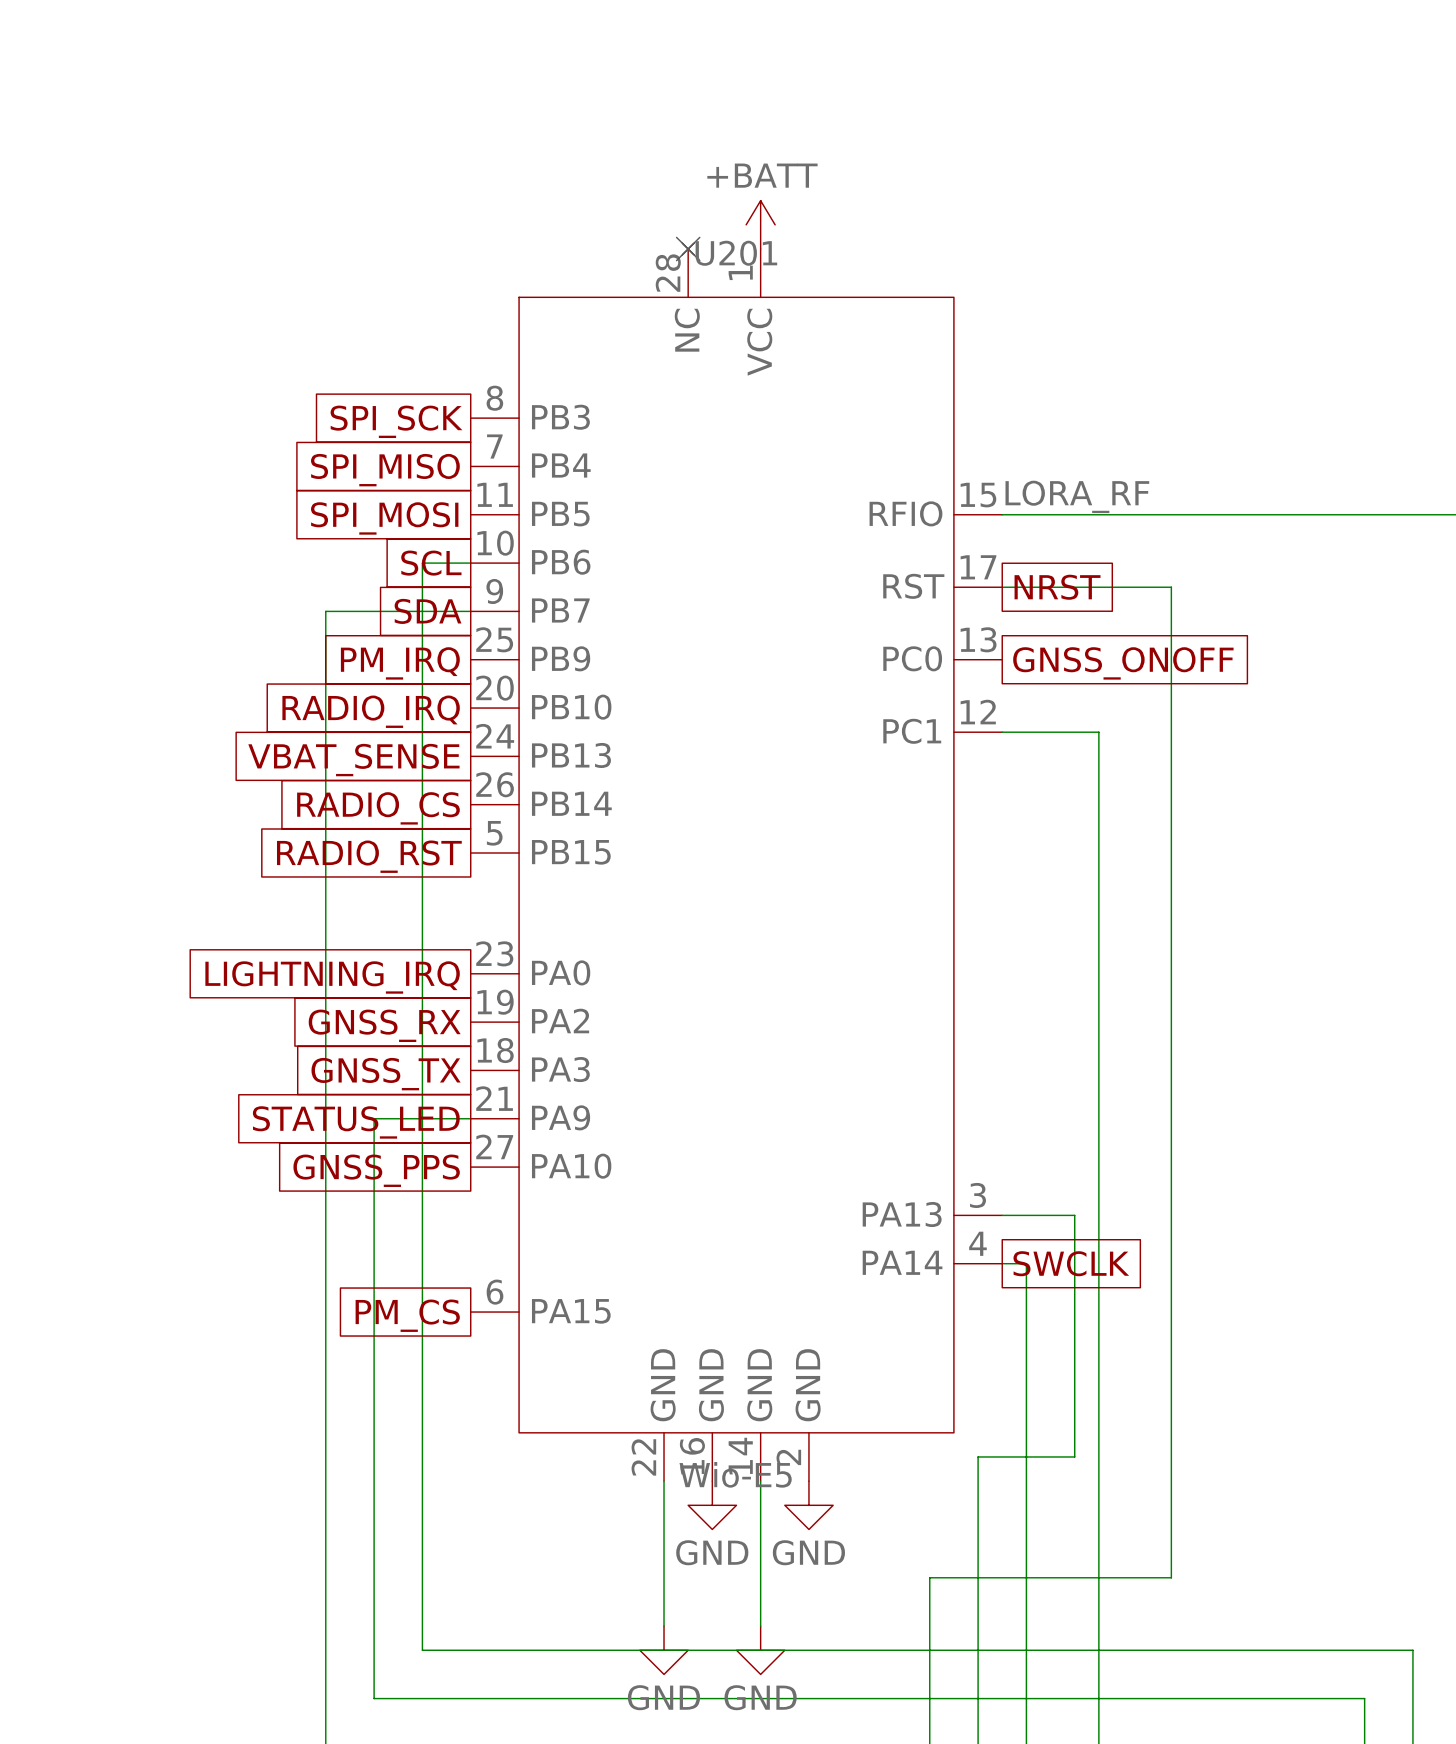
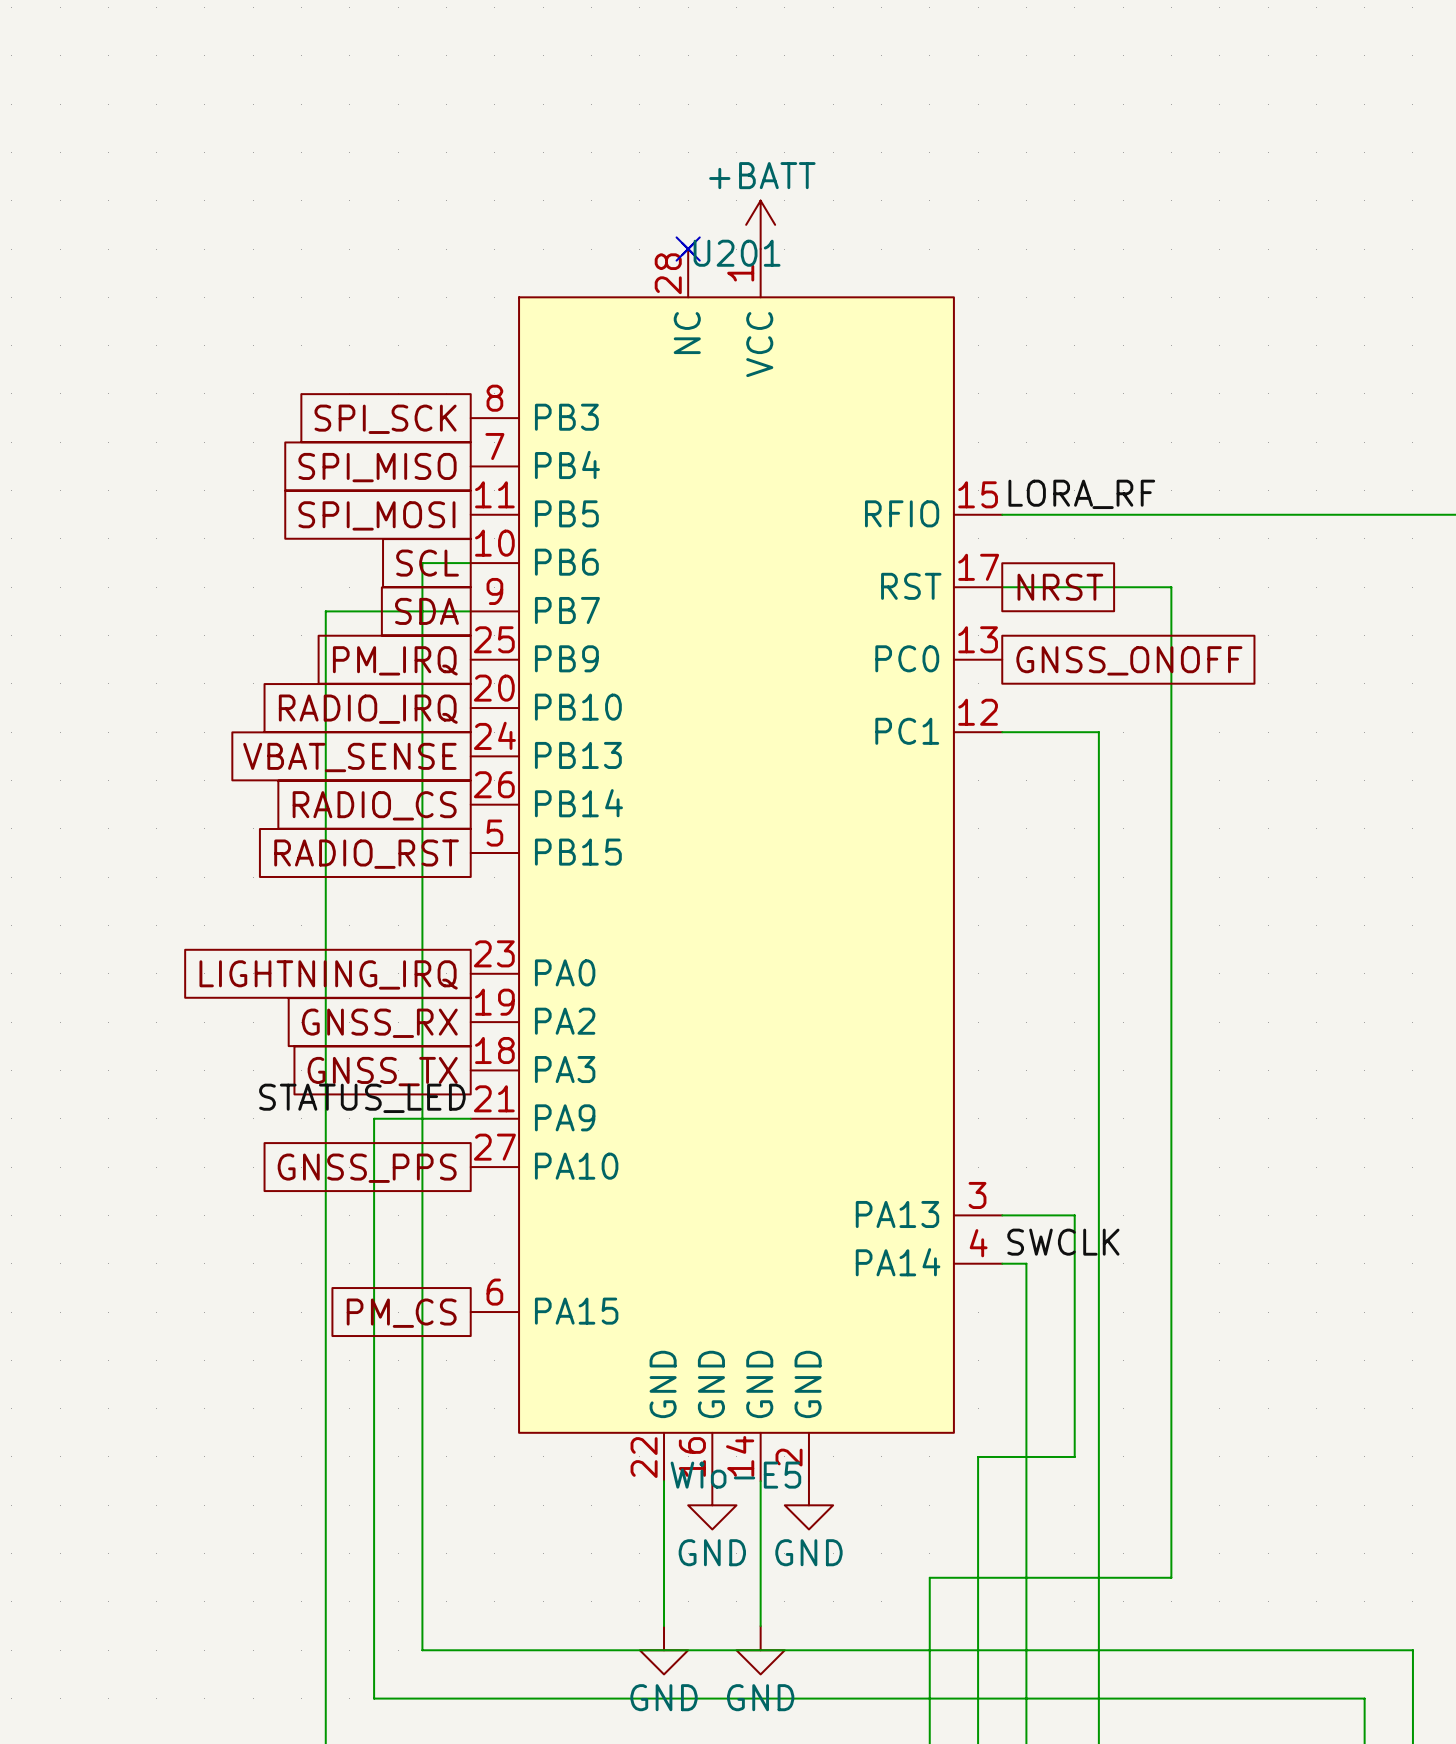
label: none -> STATUS_LED (362, 1098)
global label: STATUS_LED (356, 1122) -> none
label: none -> SWCLK (1063, 1242)
global label: SWCLK (1071, 1263) -> none

